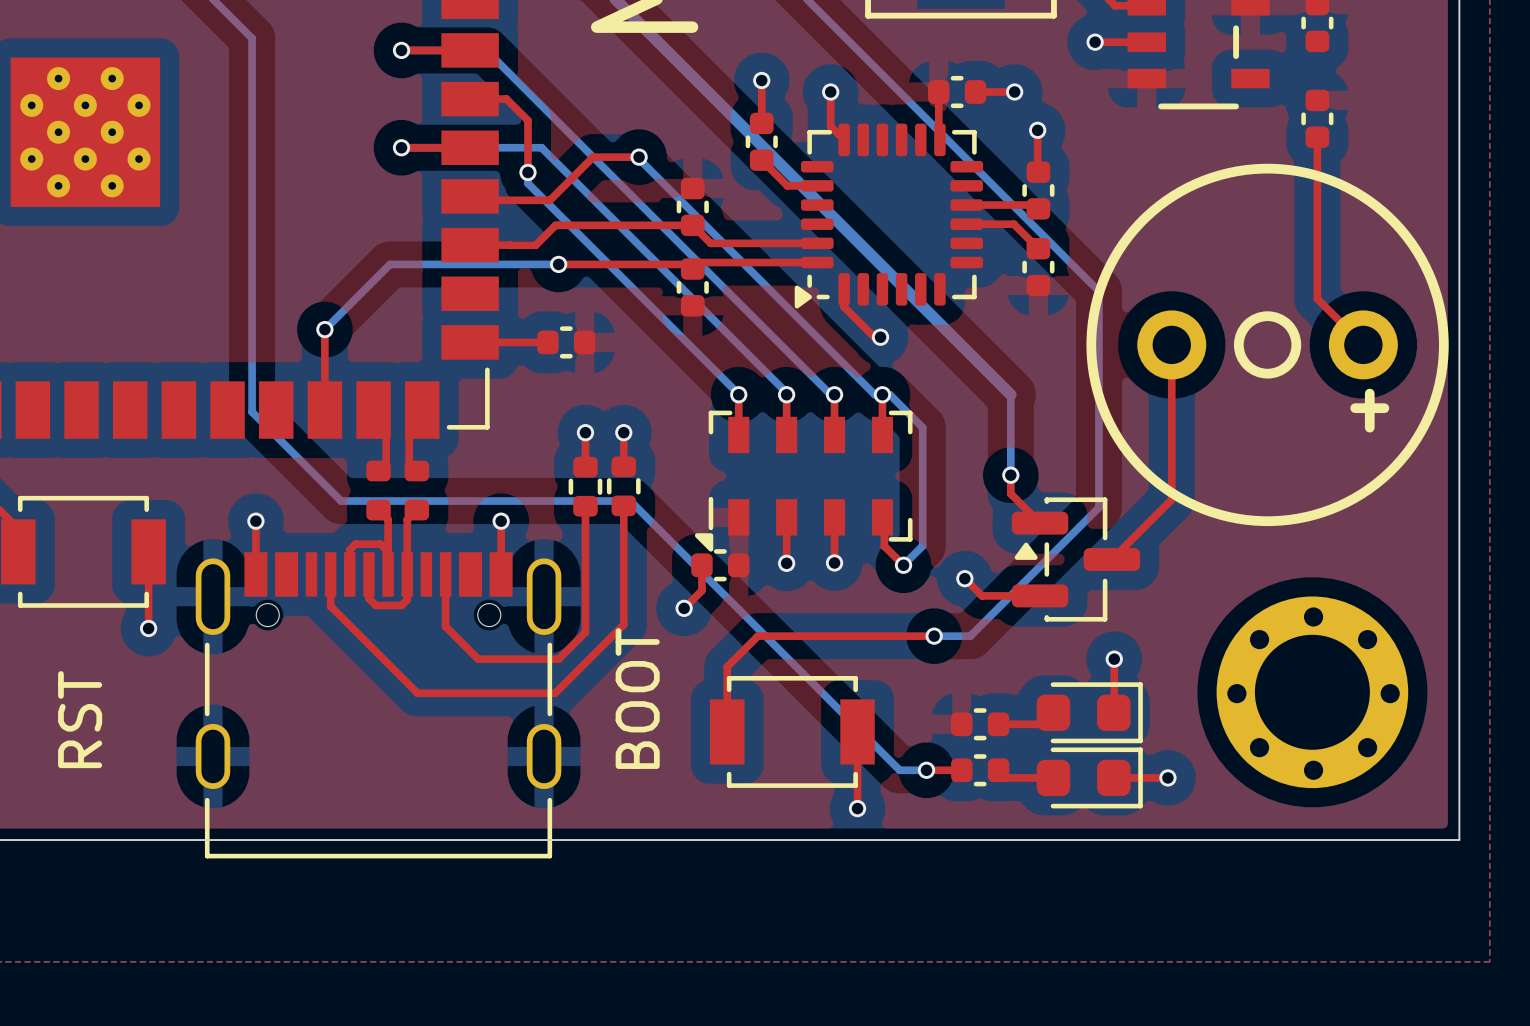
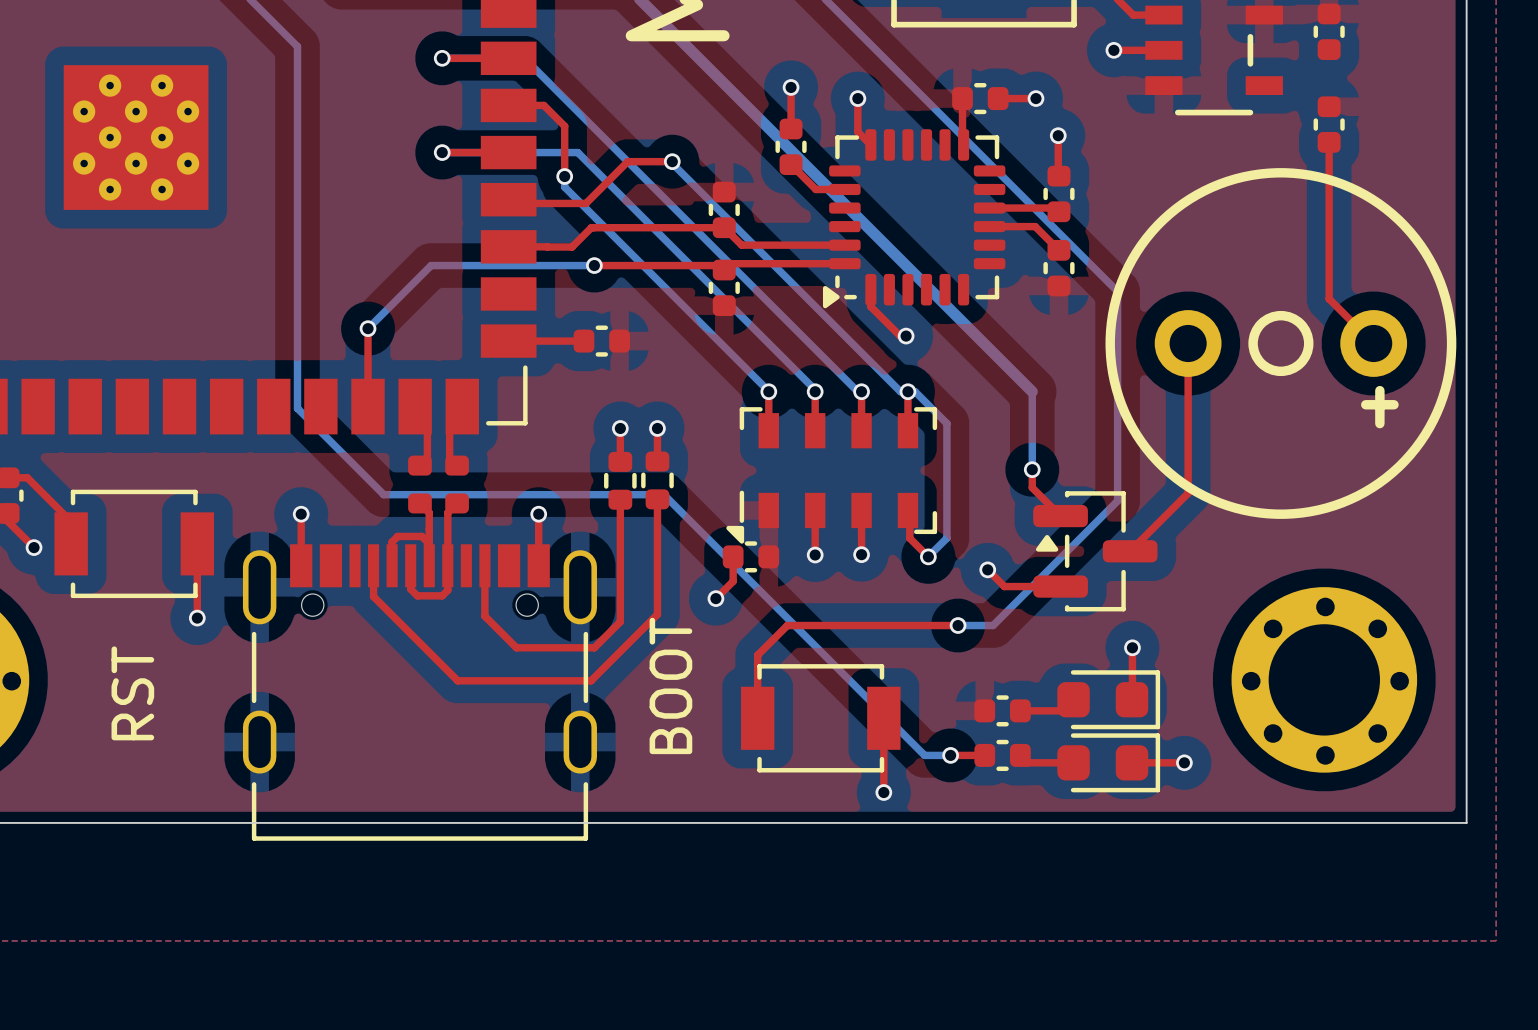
text position: RST (80, 719) -> RST (132, 693)

